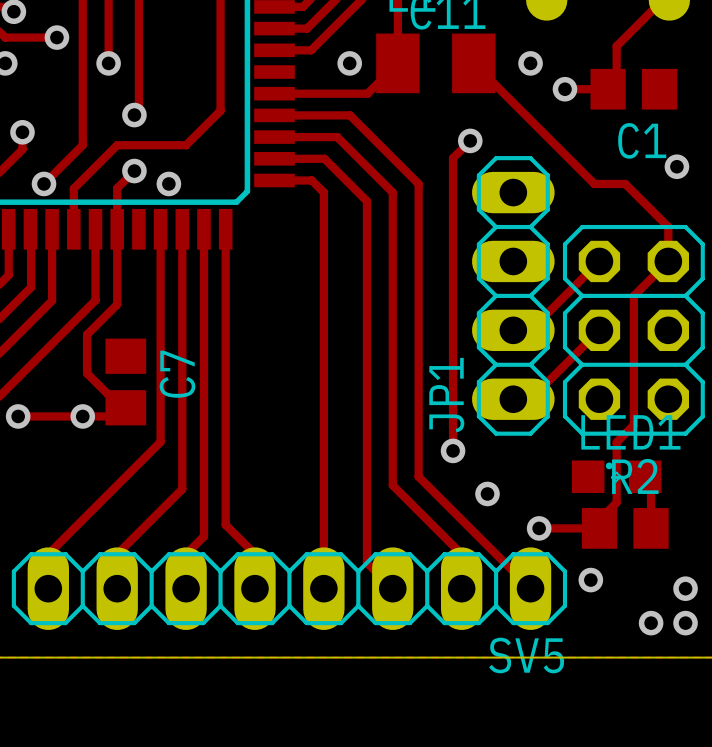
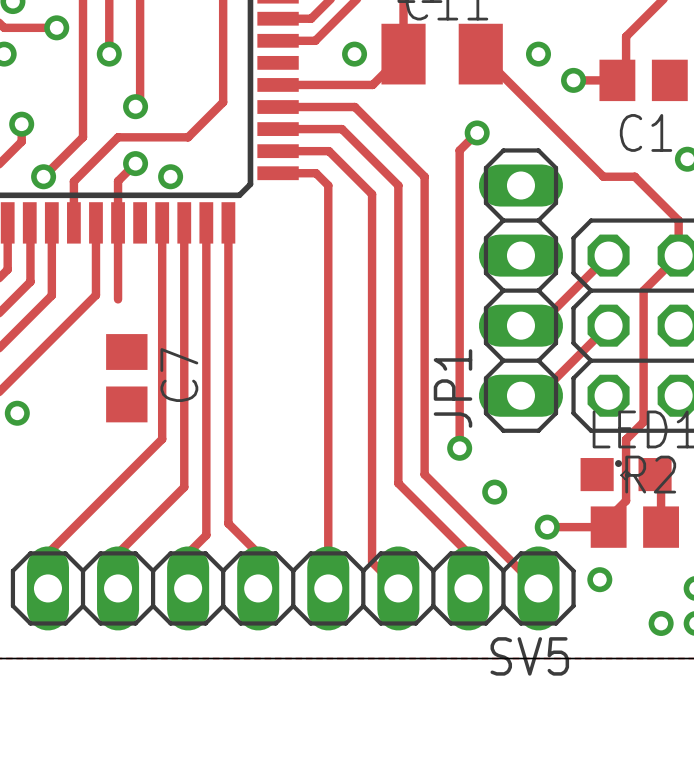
track: (117, 304) (87, 334) (87, 373) (108, 394) (112, 394) (125, 407) (117, 416) (18, 416) -> none
via: (82, 416) -> none

